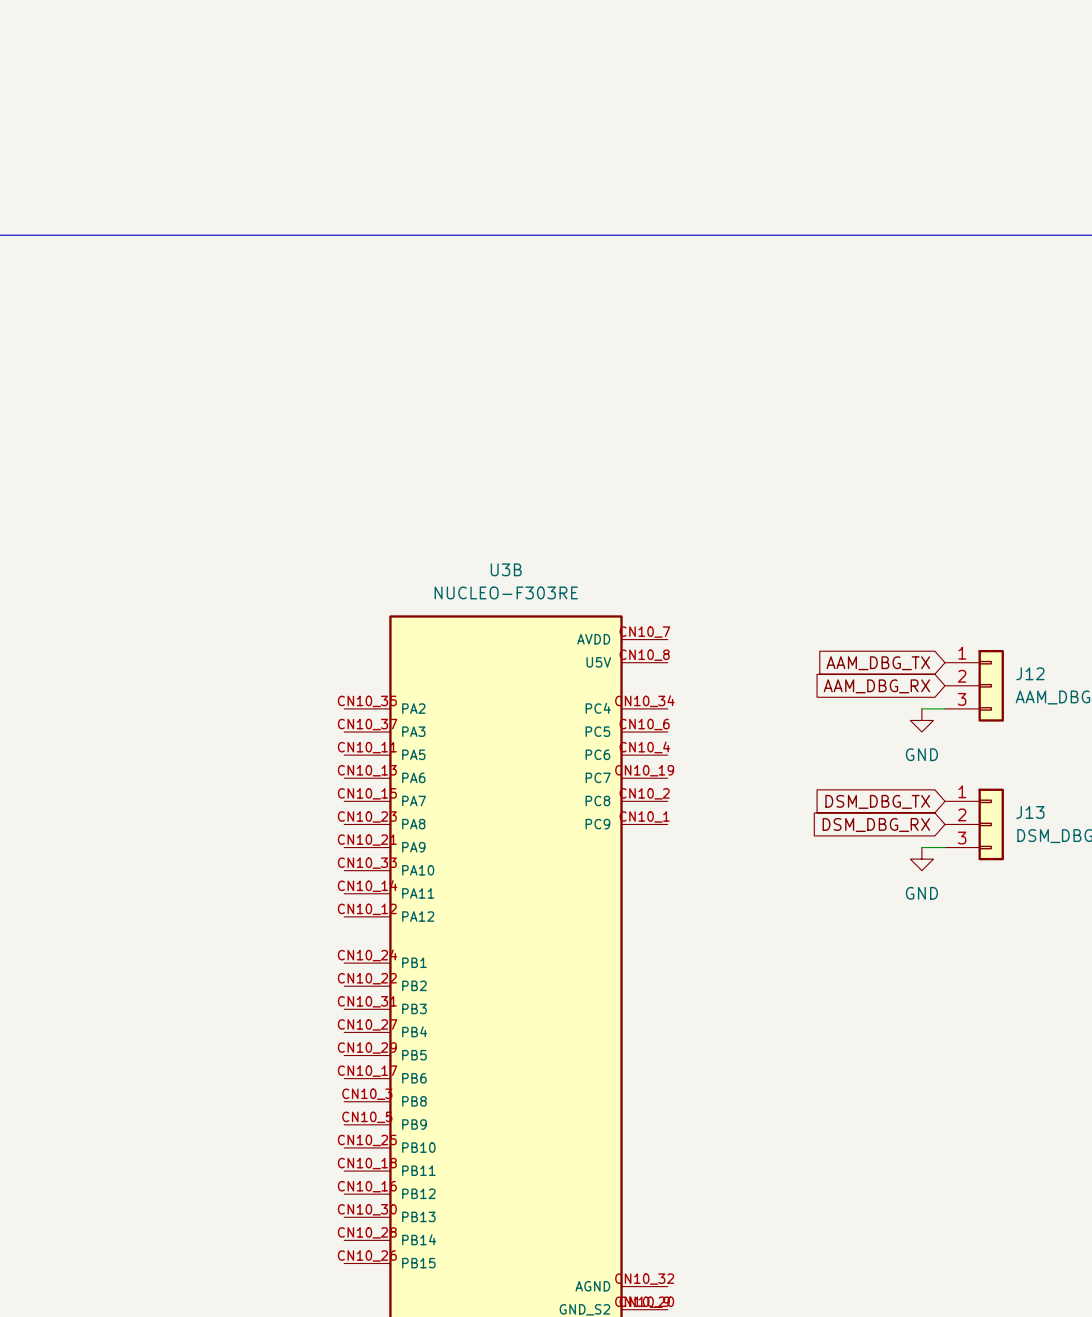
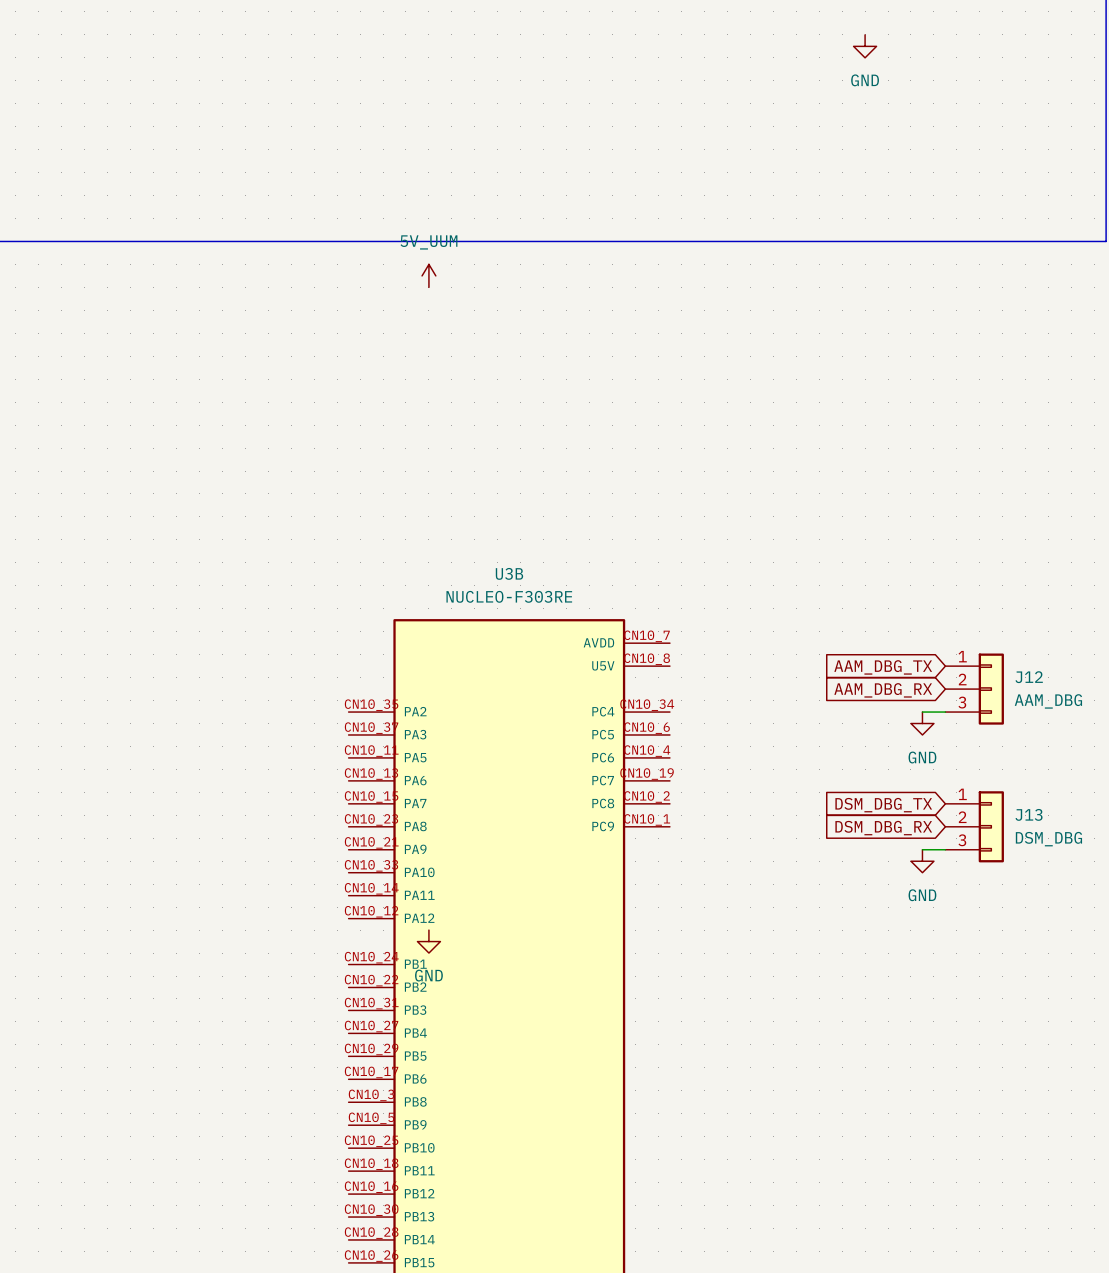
power symbol: none -> GND (865, 46)
power symbol: none -> 5V_UUM (428, 275)
power symbol: none -> GND (428, 941)

